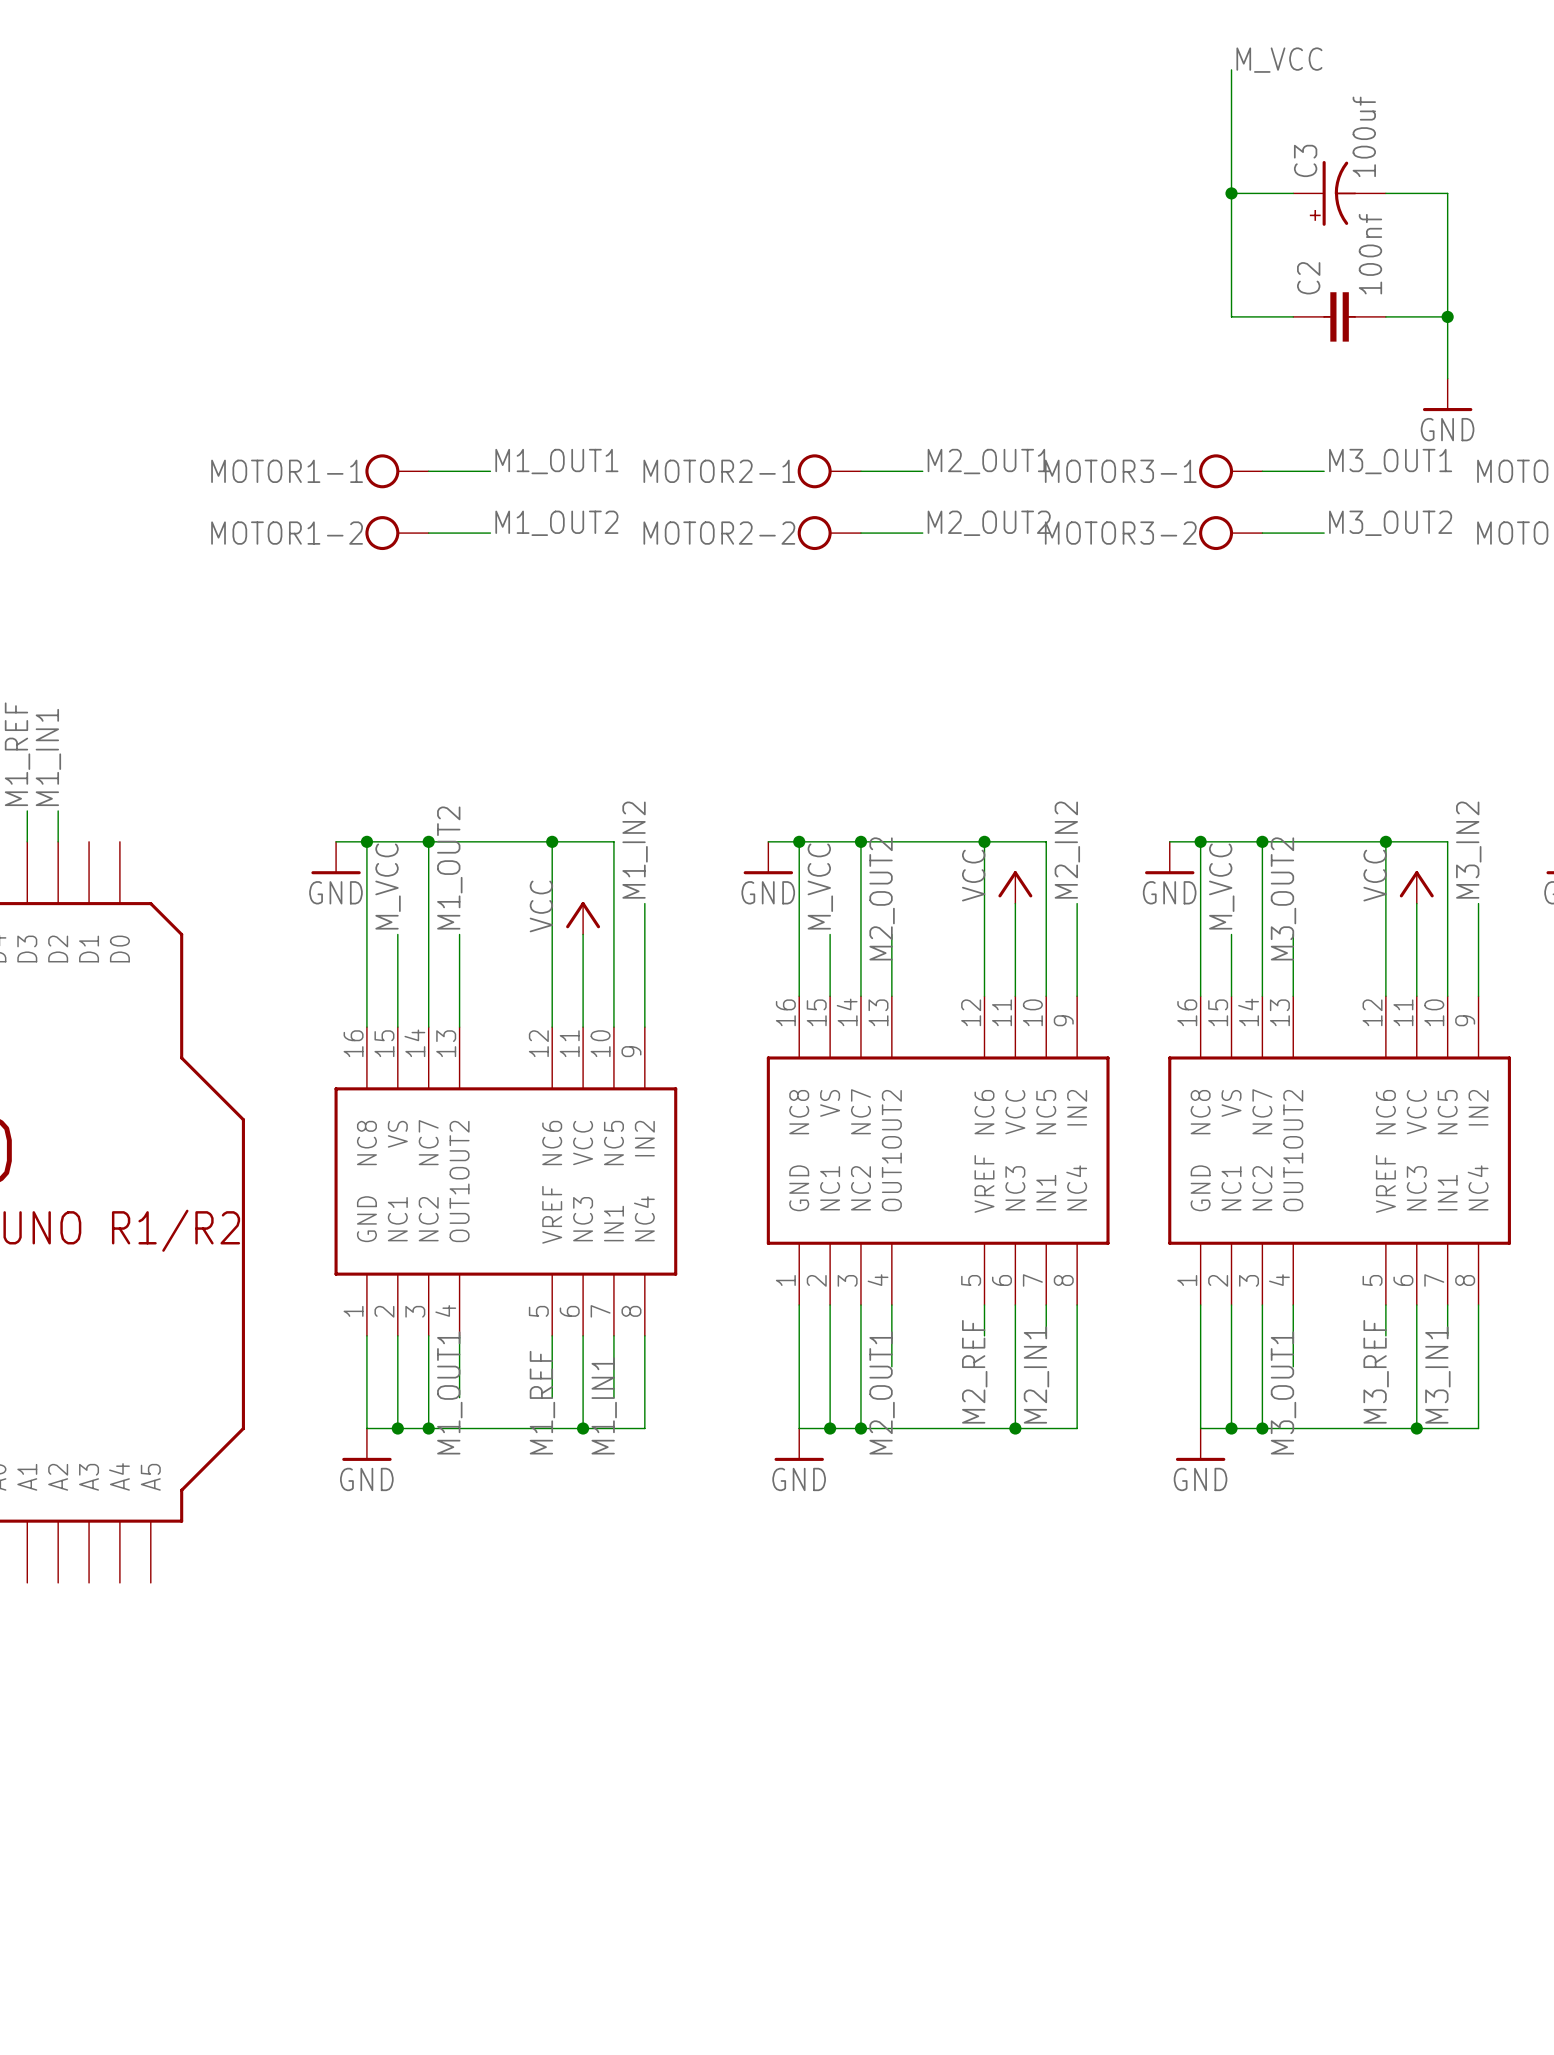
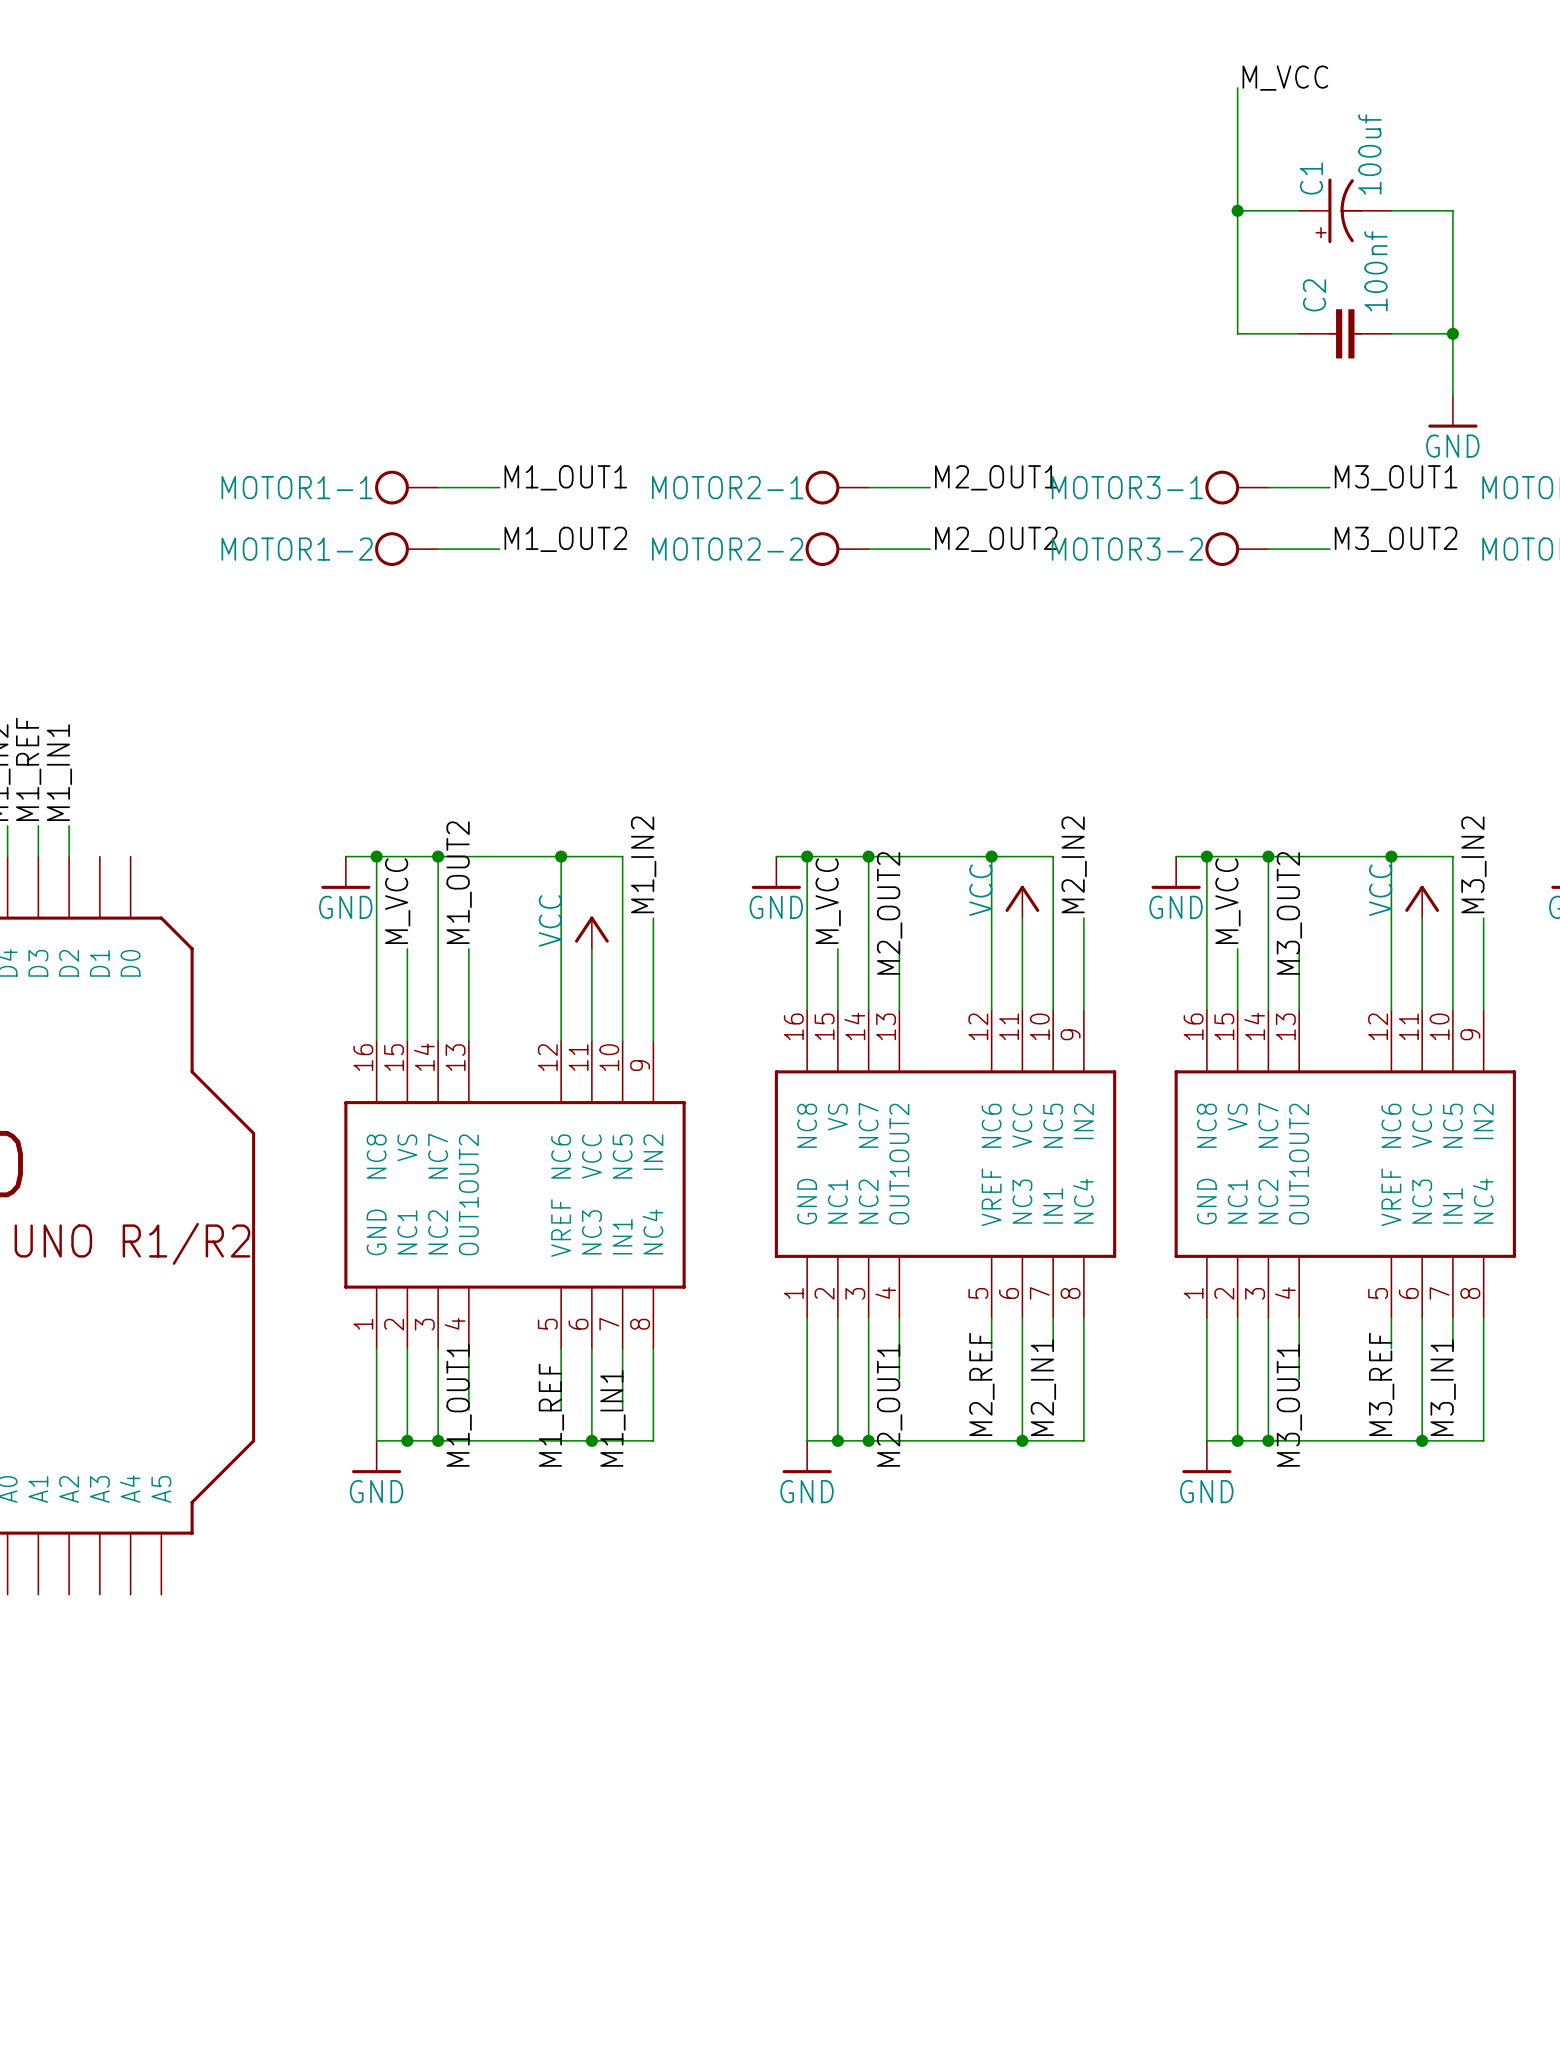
C3 name: C3 (1305, 160) -> C1 (1311, 178)

